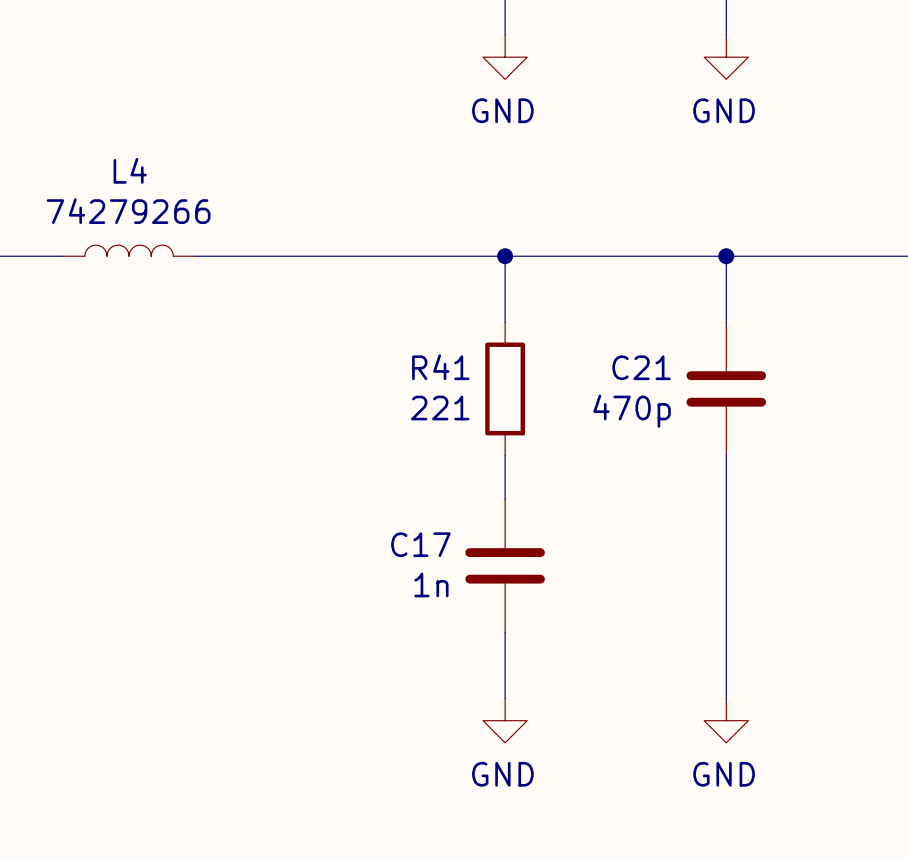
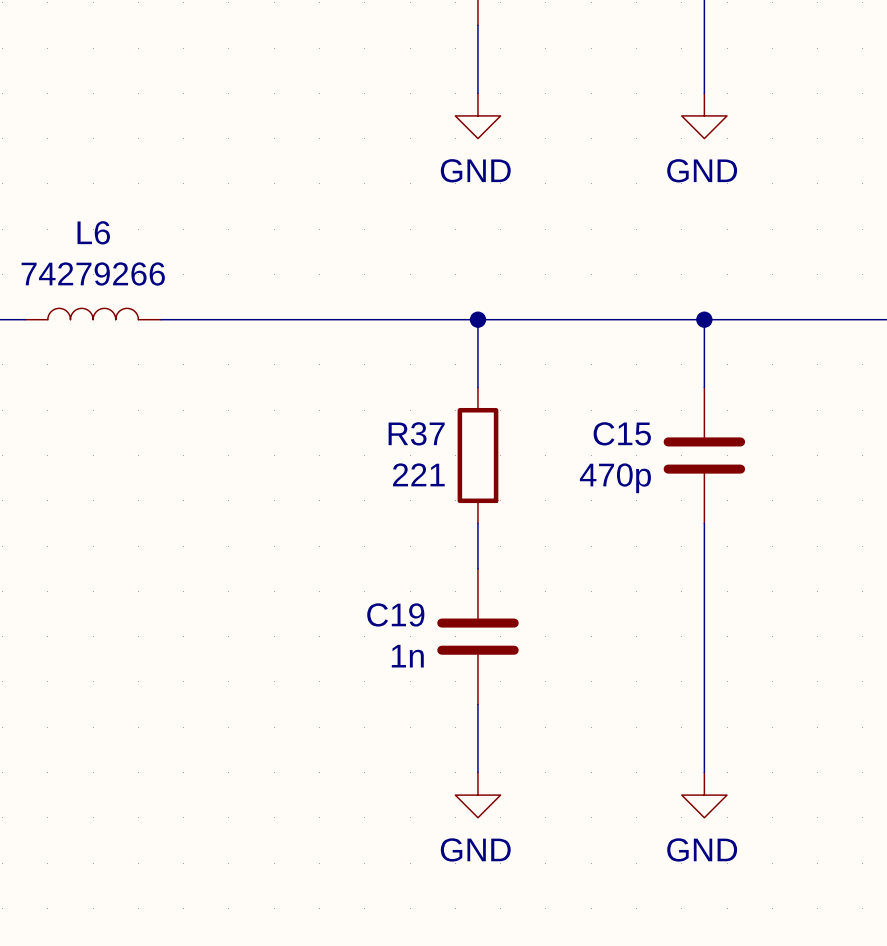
L4 name: L4 (130, 170) -> L6 (93, 232)
R41 name: R41 (440, 367) -> R37 (416, 433)
C21 name: C21 (641, 367) -> C15 (622, 433)
C17 name: C17 (420, 544) -> C19 (395, 614)

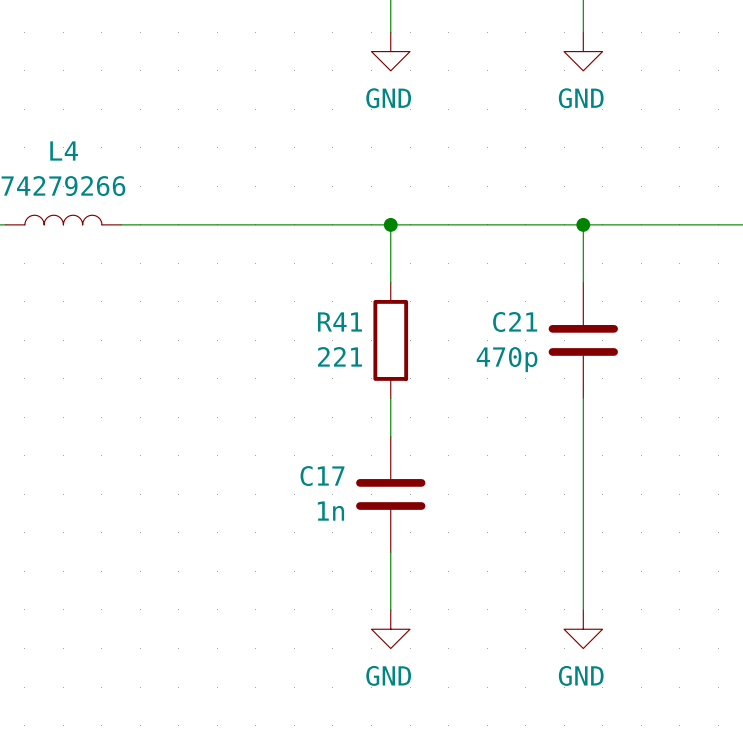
L6 name: L6 (93, 232) -> L4 (64, 150)
R37 name: R37 (416, 433) -> R41 (339, 321)
C15 name: C15 (622, 433) -> C21 (515, 321)
C19 name: C19 (395, 614) -> C17 (322, 476)

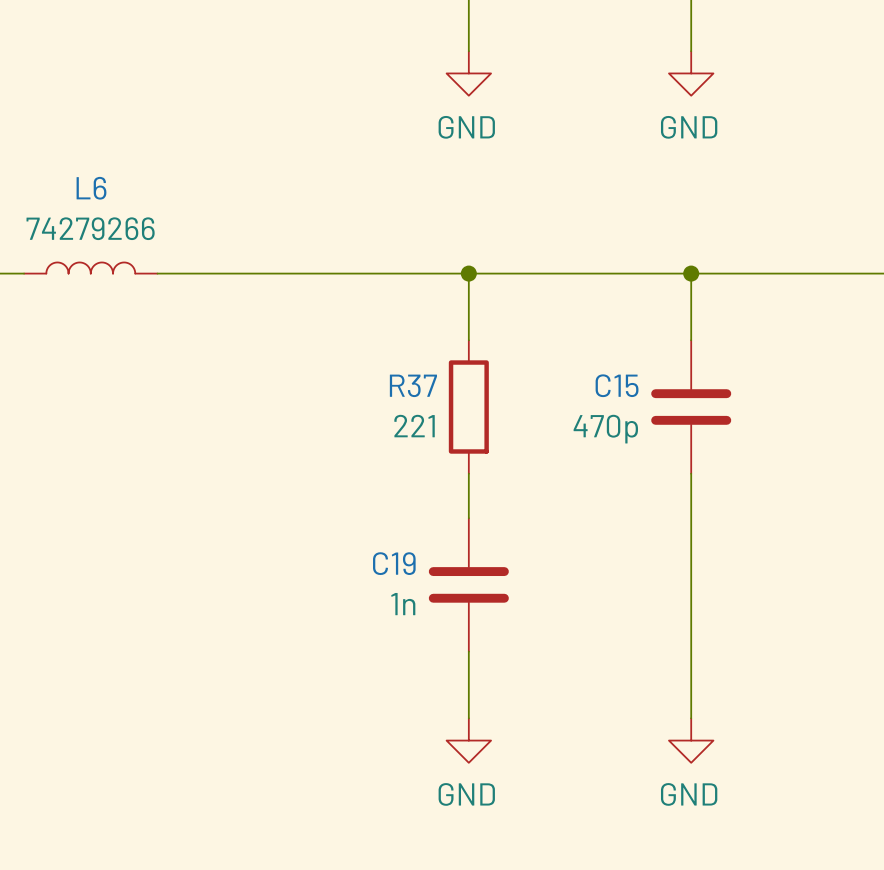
L4 name: L4 (64, 150) -> L6 (91, 188)
R41 name: R41 (339, 321) -> R37 (413, 385)
C21 name: C21 (515, 321) -> C15 (617, 385)
C17 name: C17 (322, 476) -> C19 (394, 563)

